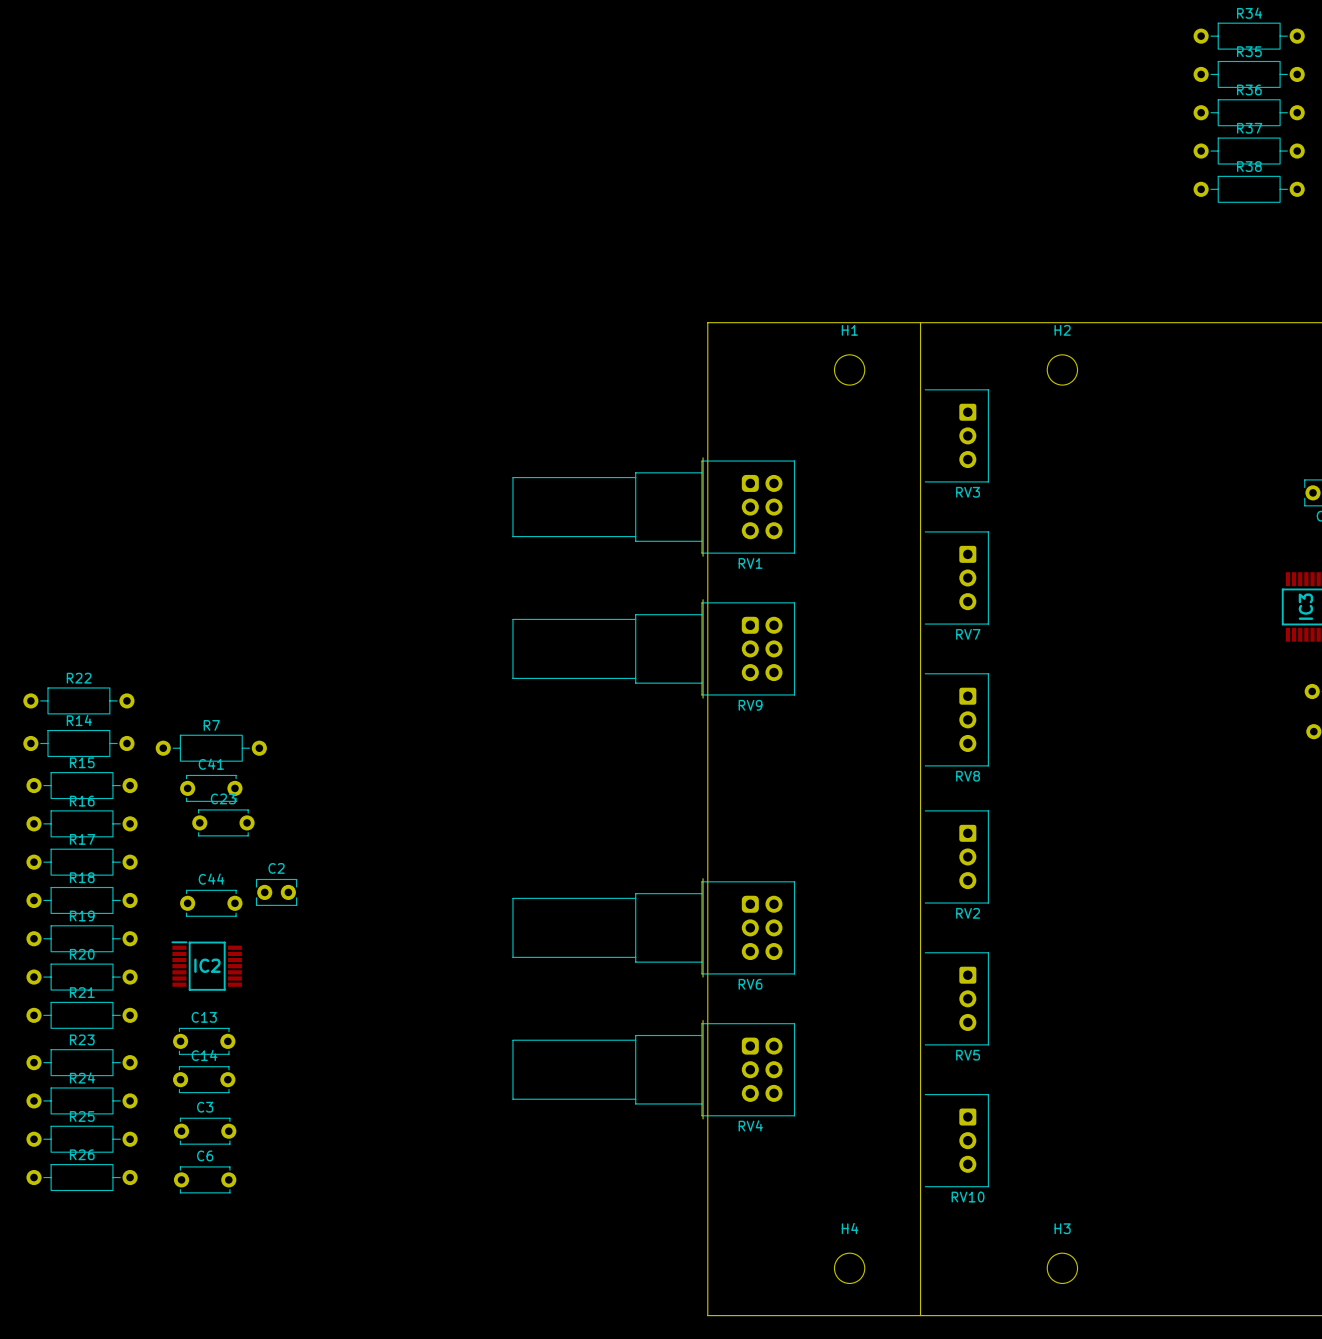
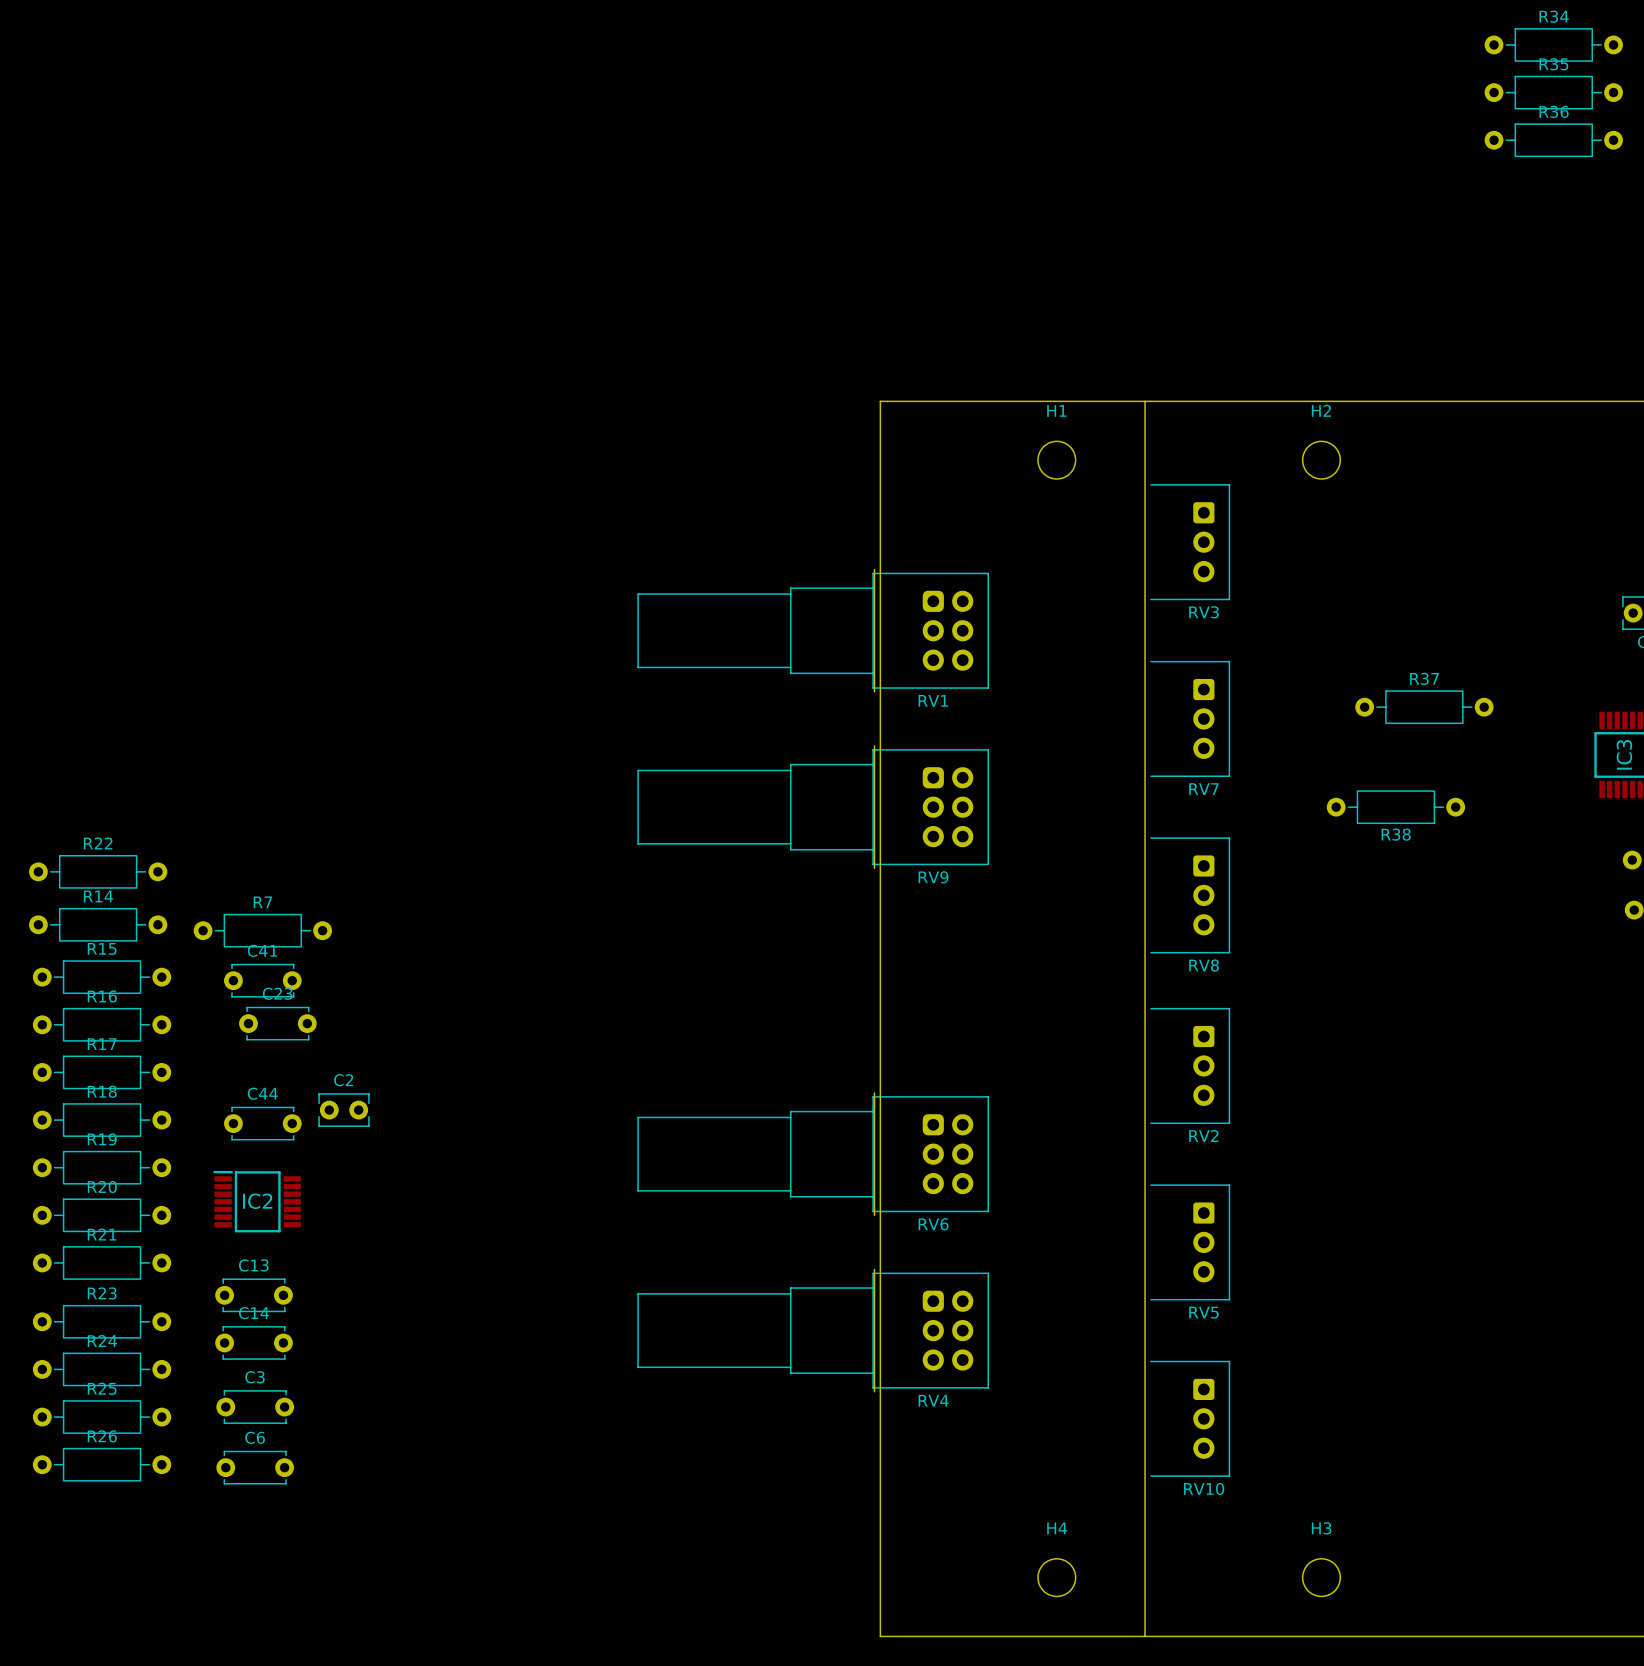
R37 position: (1249, 151) -> (1424, 707)
R38 name position: R38 (1249, 166) -> R38 (1396, 834)
R38 position: (1249, 189) -> (1395, 807)

